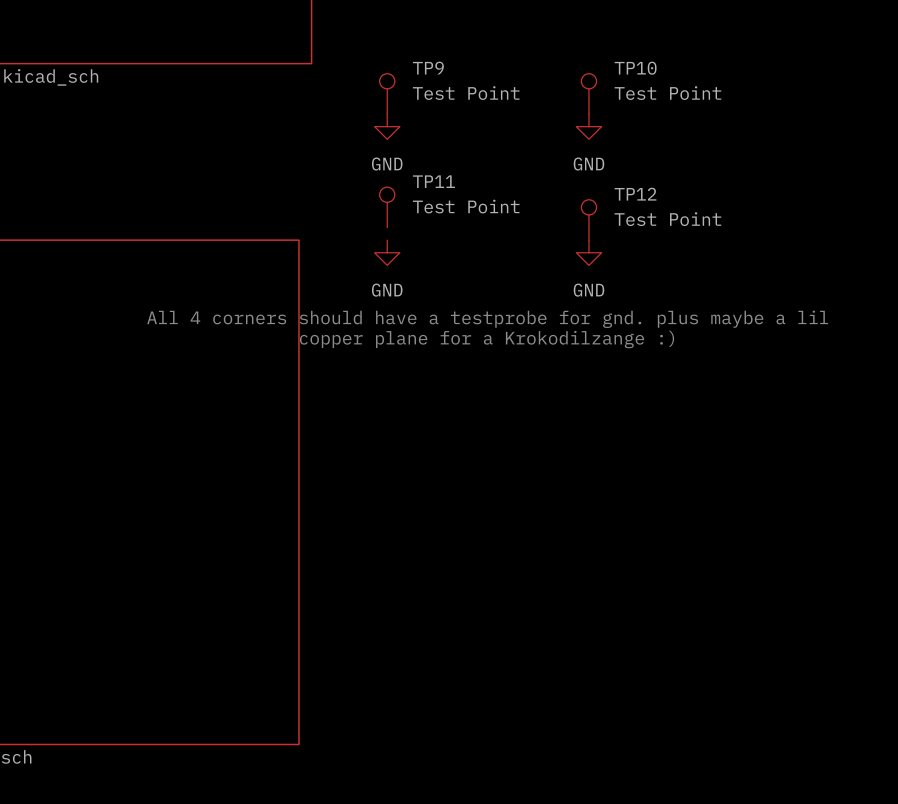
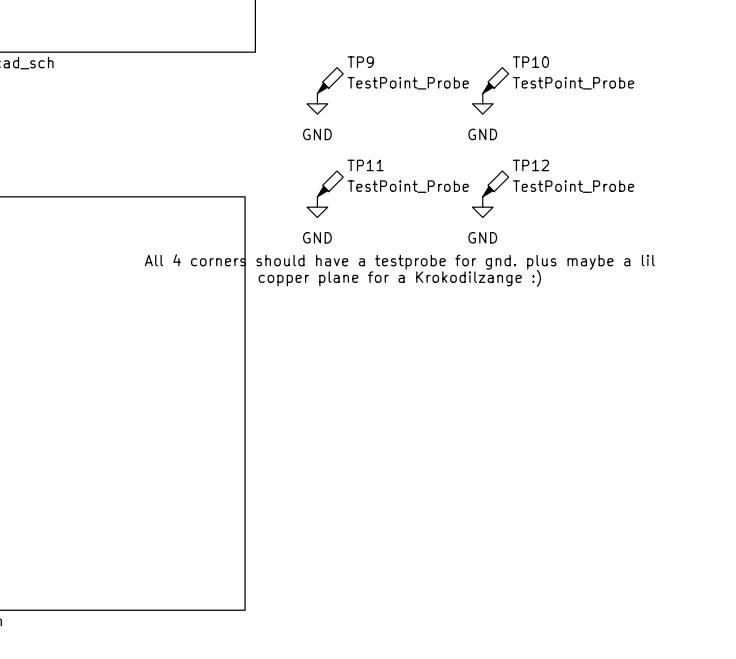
TP9 symbol: [379, 73, 395, 115] -> [317, 67, 344, 94]
TP10 symbol: [581, 73, 597, 115] -> [482, 67, 509, 94]
TP9 value: Test Point (466, 93) -> TestPoint_Probe (408, 83)
TP10 value: Test Point (667, 93) -> TestPoint_Probe (573, 83)
TP11 symbol: [379, 187, 395, 228] -> [317, 171, 344, 197]
TP12 symbol: [581, 199, 597, 241] -> [482, 171, 509, 197]
TP11 value: Test Point (466, 206) -> TestPoint_Probe (408, 186)
TP12 value: Test Point (667, 219) -> TestPoint_Probe (573, 186)

